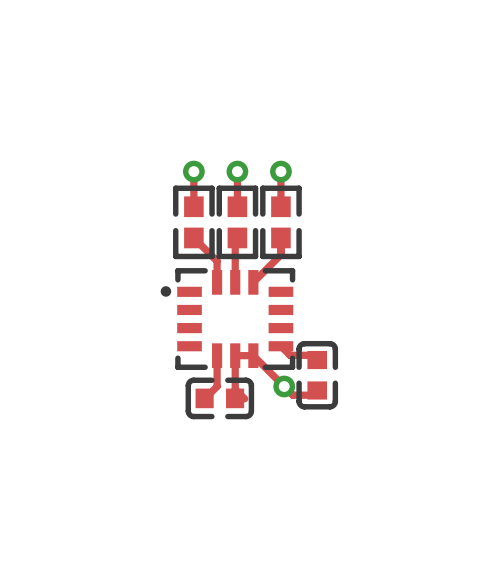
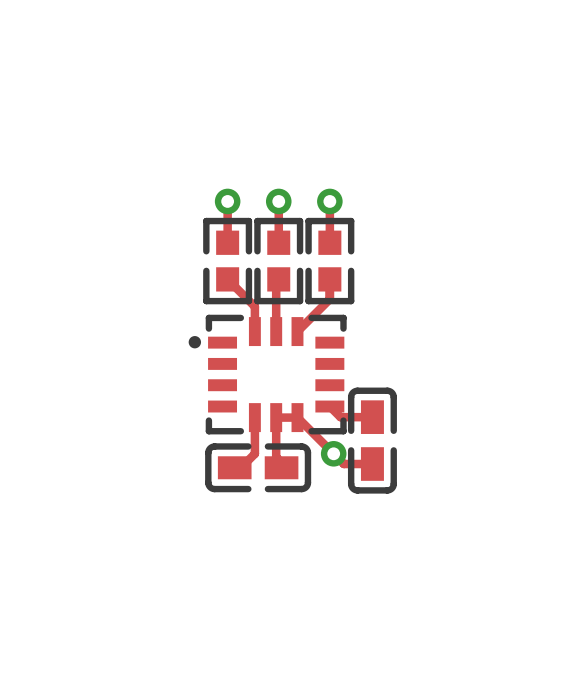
part footprint: [296, 340, 339, 410] -> [347, 387, 397, 494]
part footprint: [185, 377, 255, 420] -> [205, 443, 312, 493]

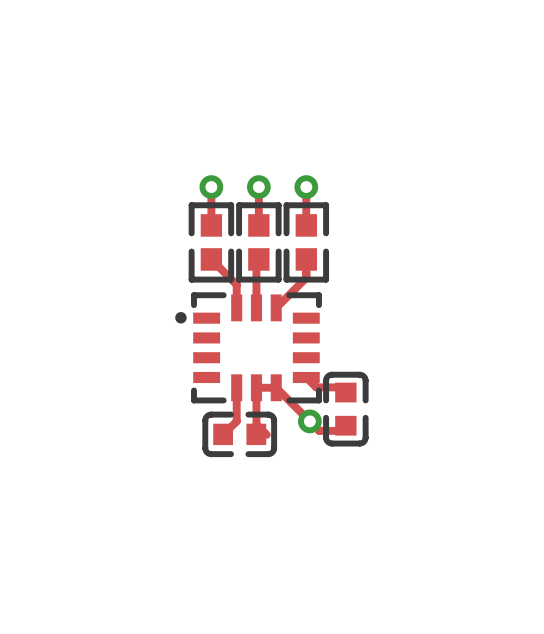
part footprint: [347, 387, 397, 494] -> [323, 371, 369, 447]
part footprint: [205, 443, 312, 493] -> [202, 411, 278, 458]

